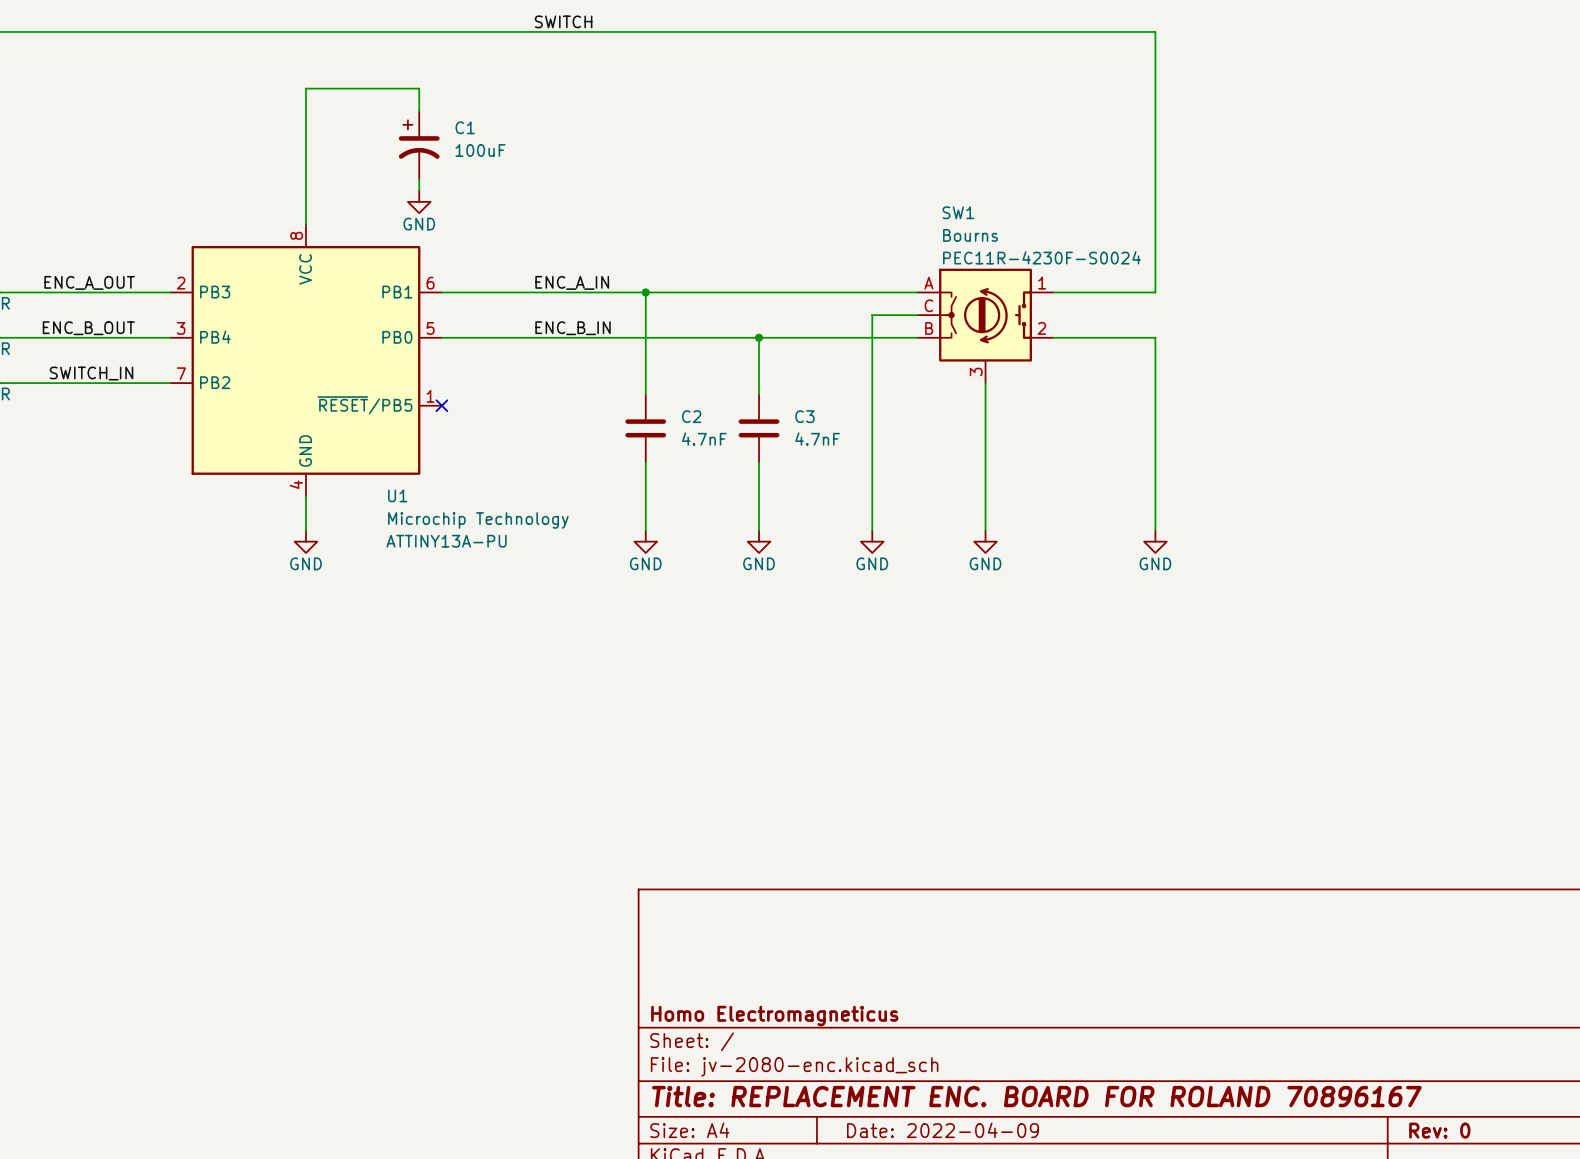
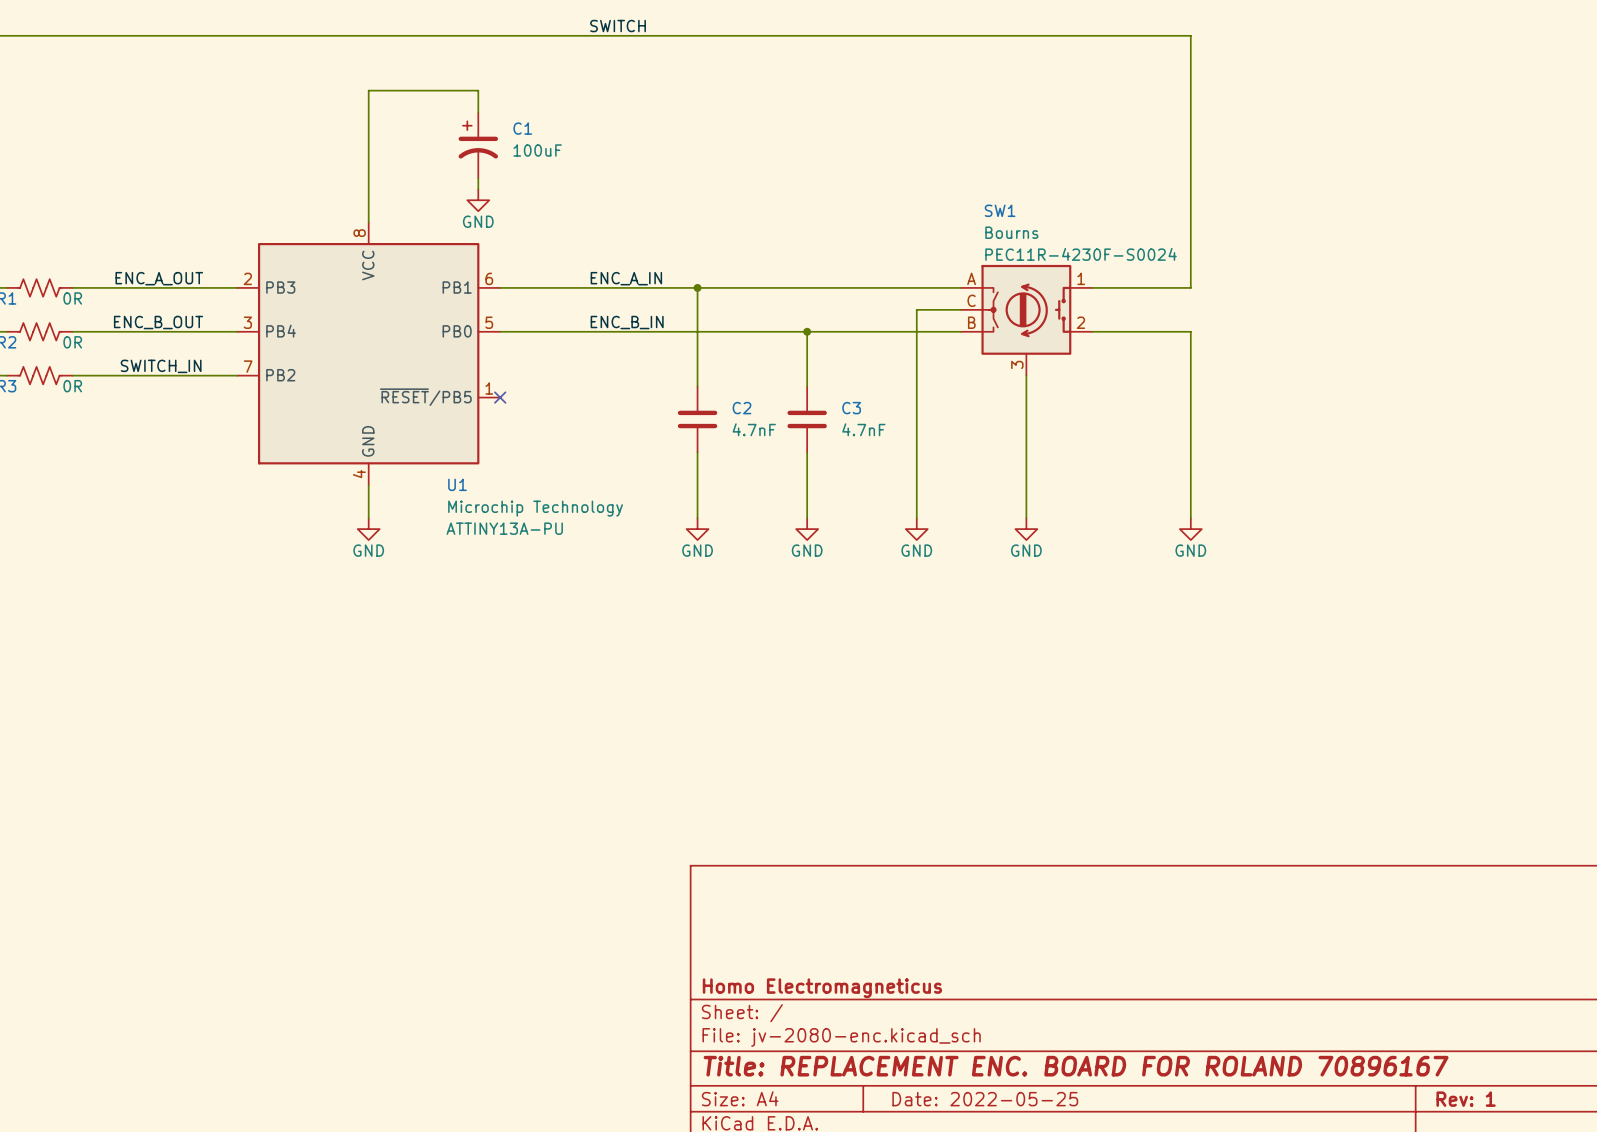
title block: Date: 2022-04-09 (943, 1130) -> Date: 2022-05-25 (985, 1099)
title block: Rev: 0 (1439, 1130) -> Rev: 1 (1466, 1099)

